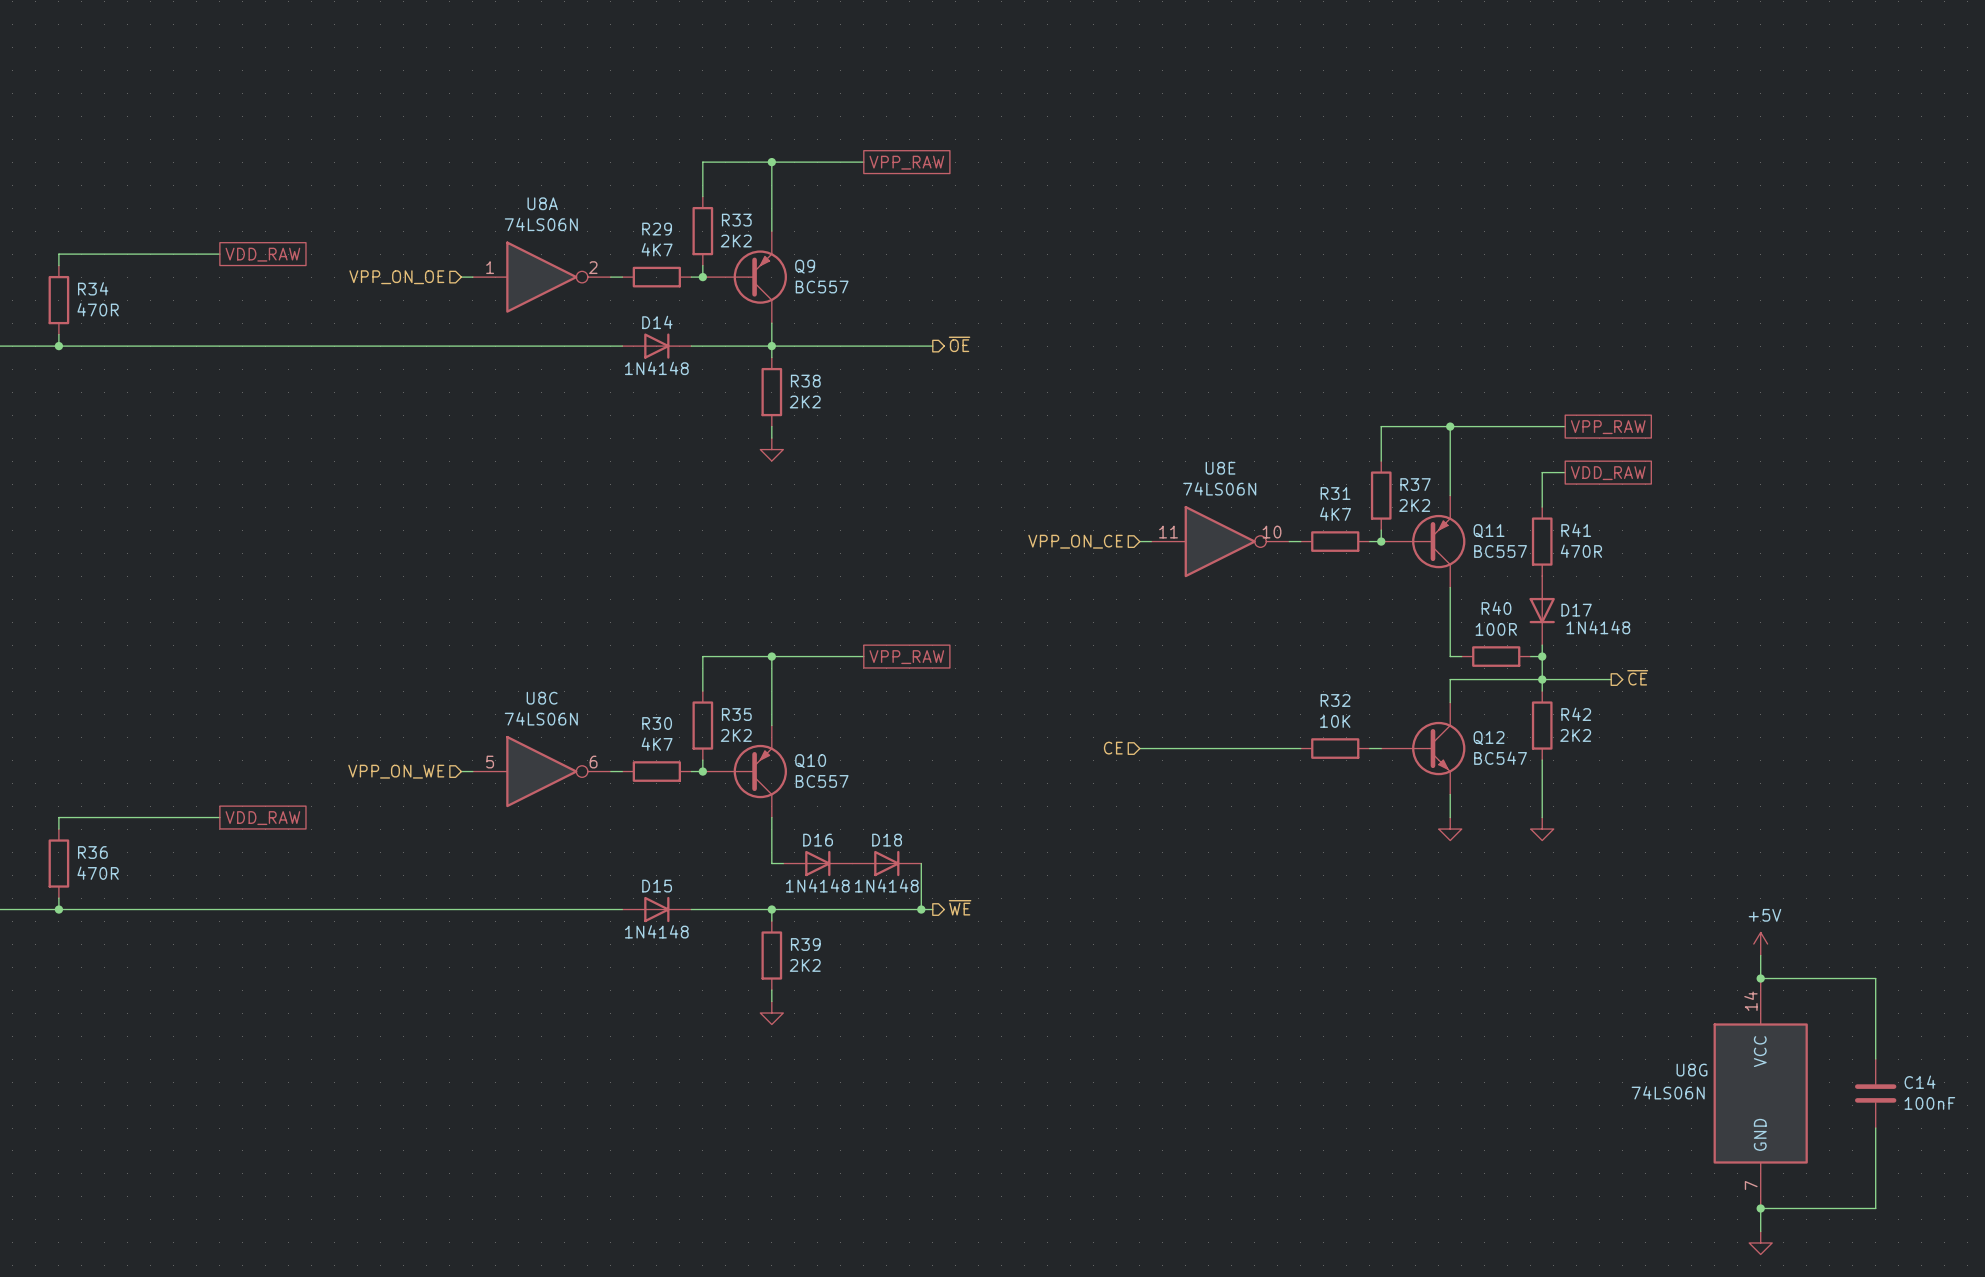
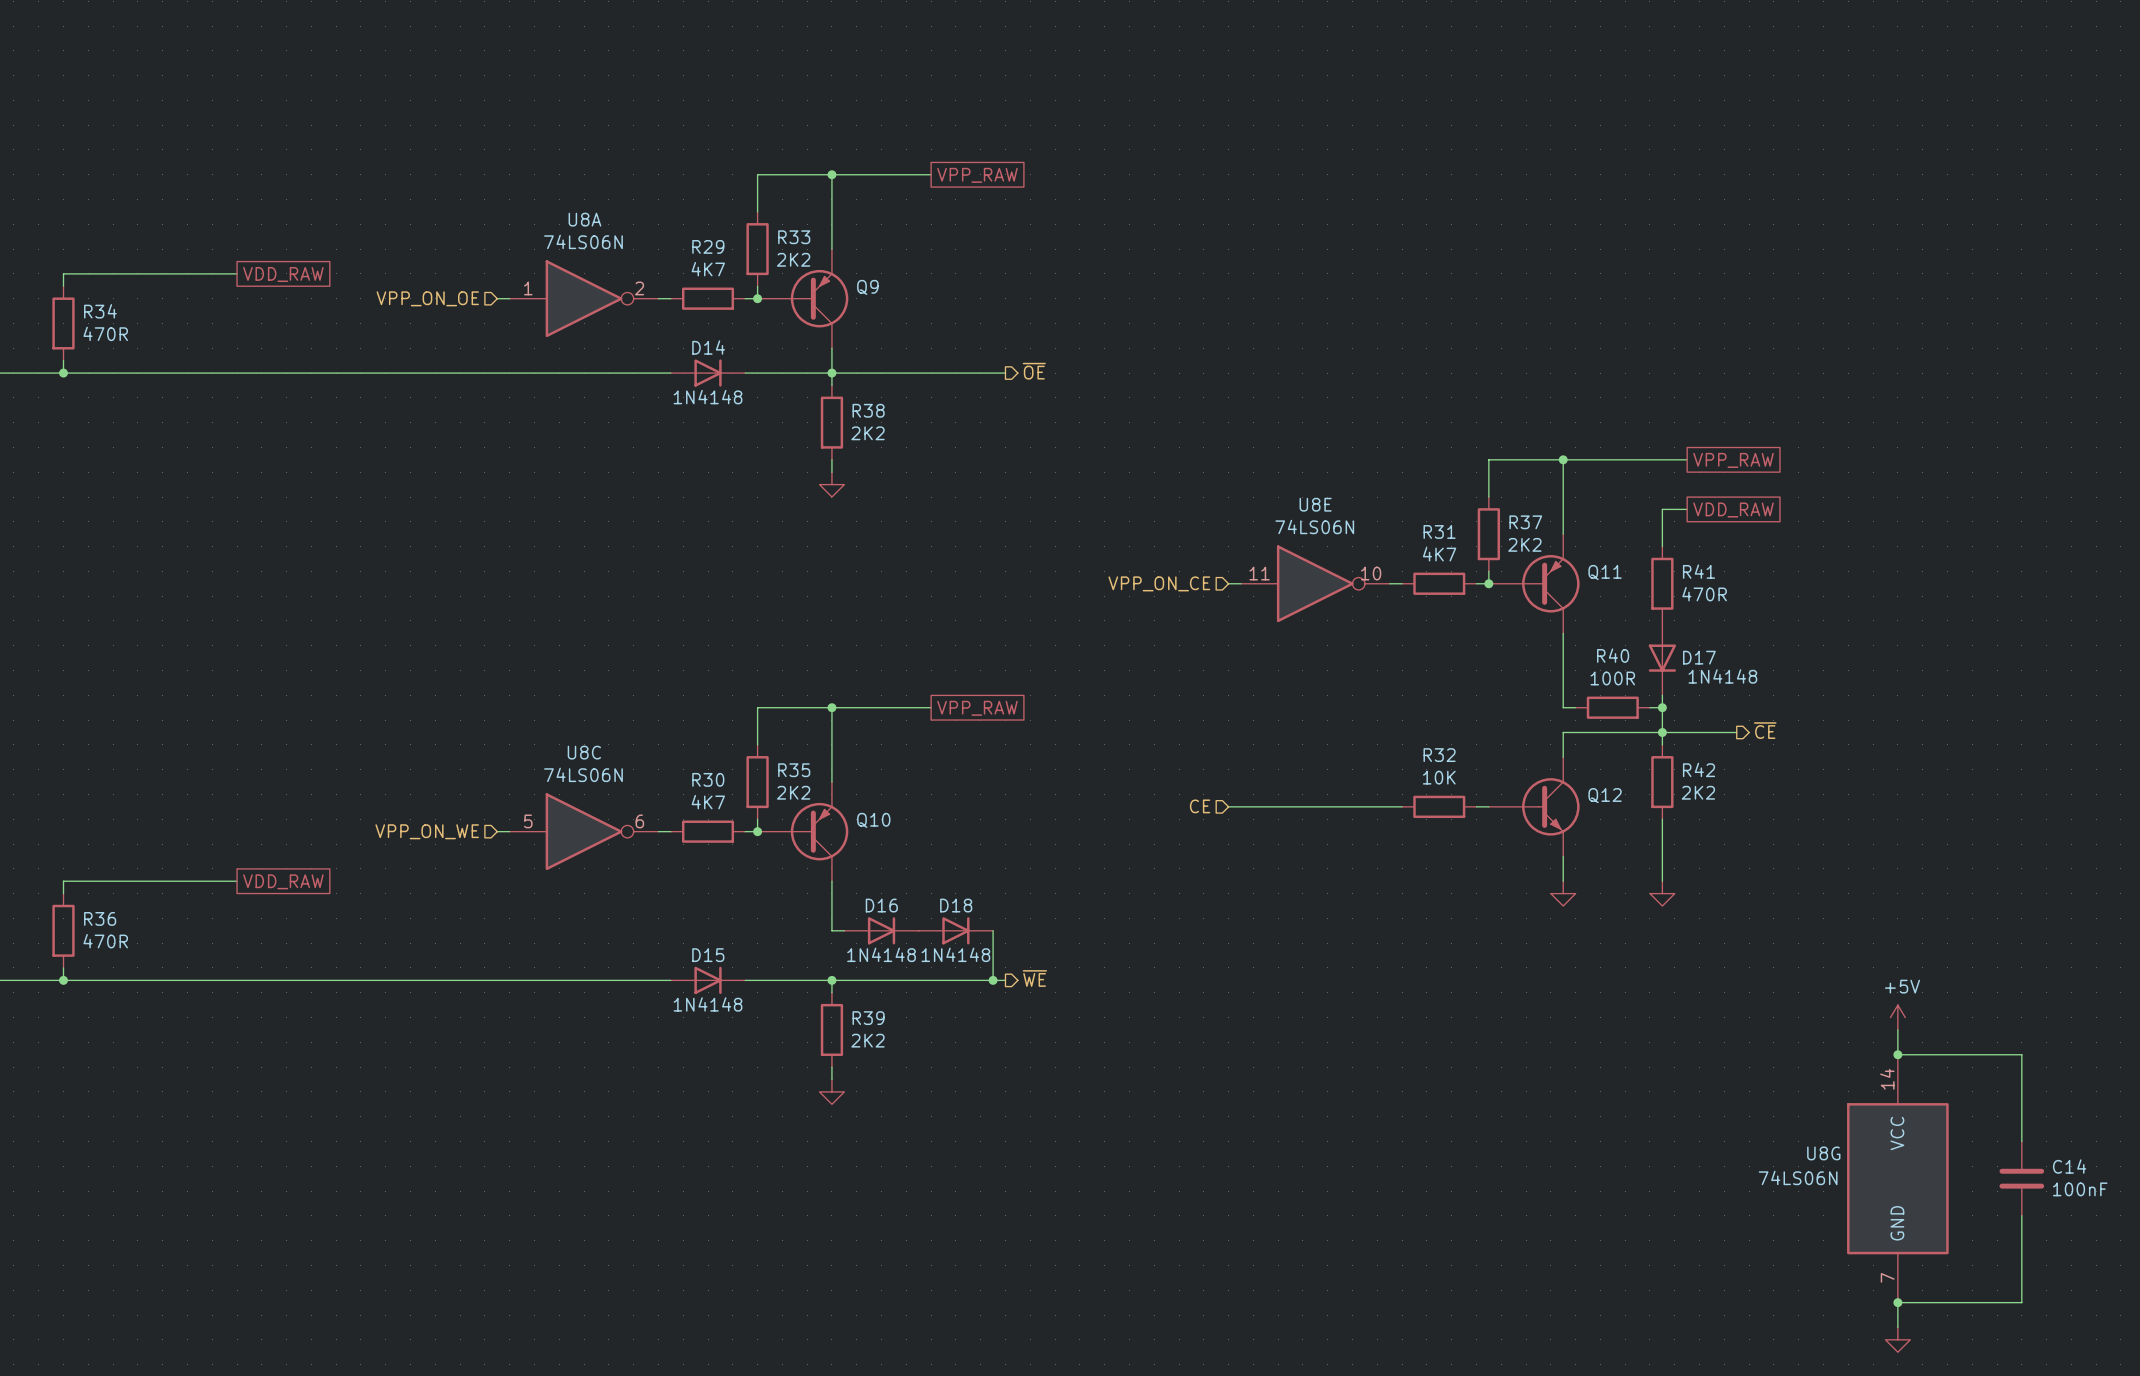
Q9 value: BC557 (822, 287) -> none
Q11 value: BC557 (1500, 551) -> none
Q12 value: BC547 (1500, 758) -> none
Q10 value: BC557 (822, 781) -> none

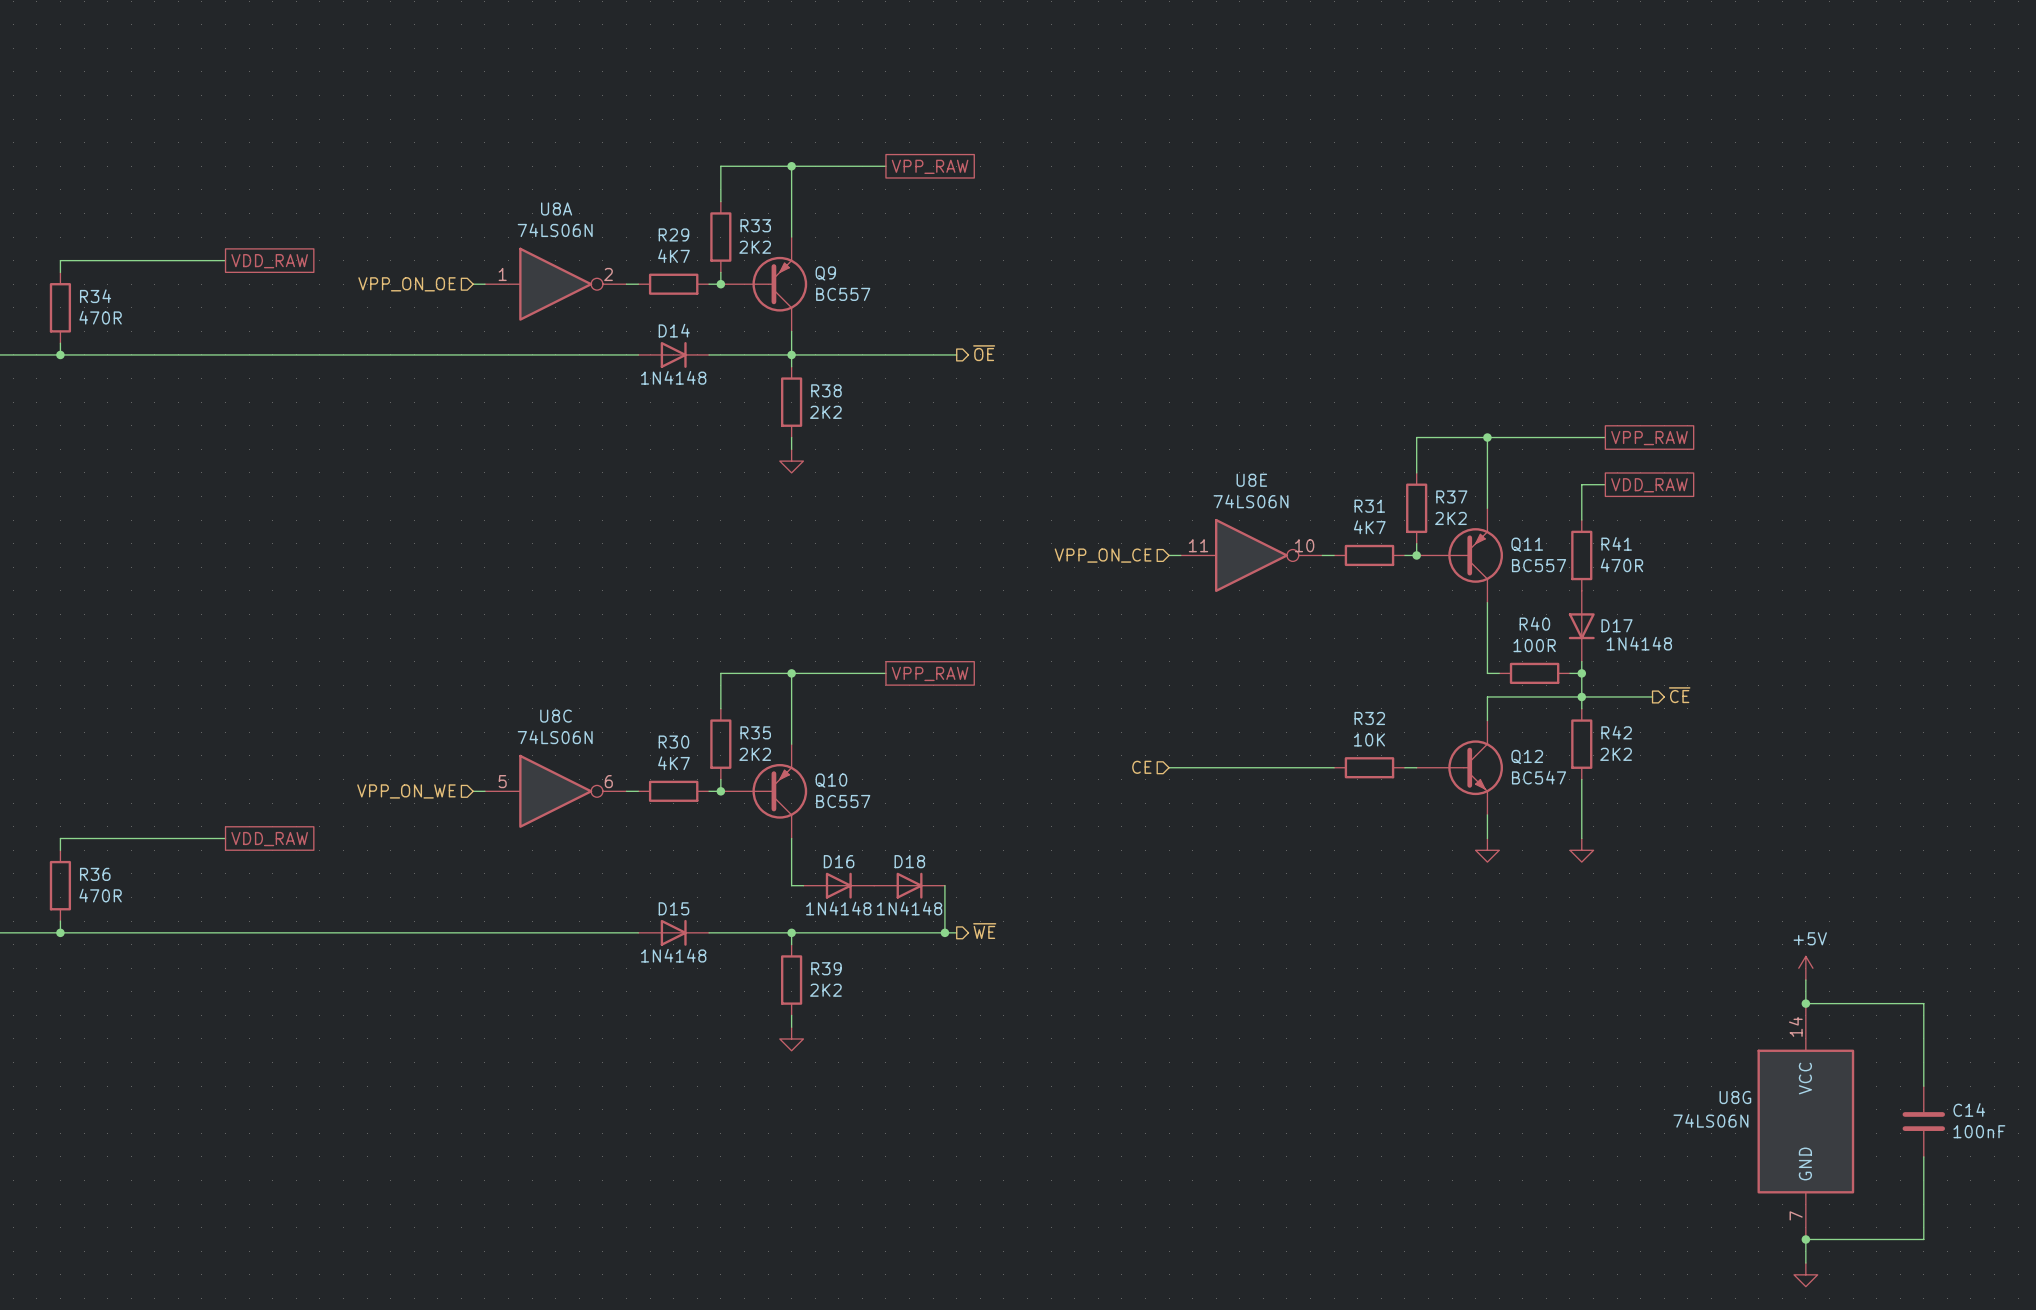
Q9 value: none -> BC557 (843, 294)
Q11 value: none -> BC557 (1539, 565)
Q12 value: none -> BC547 (1539, 777)
Q10 value: none -> BC557 (843, 801)

